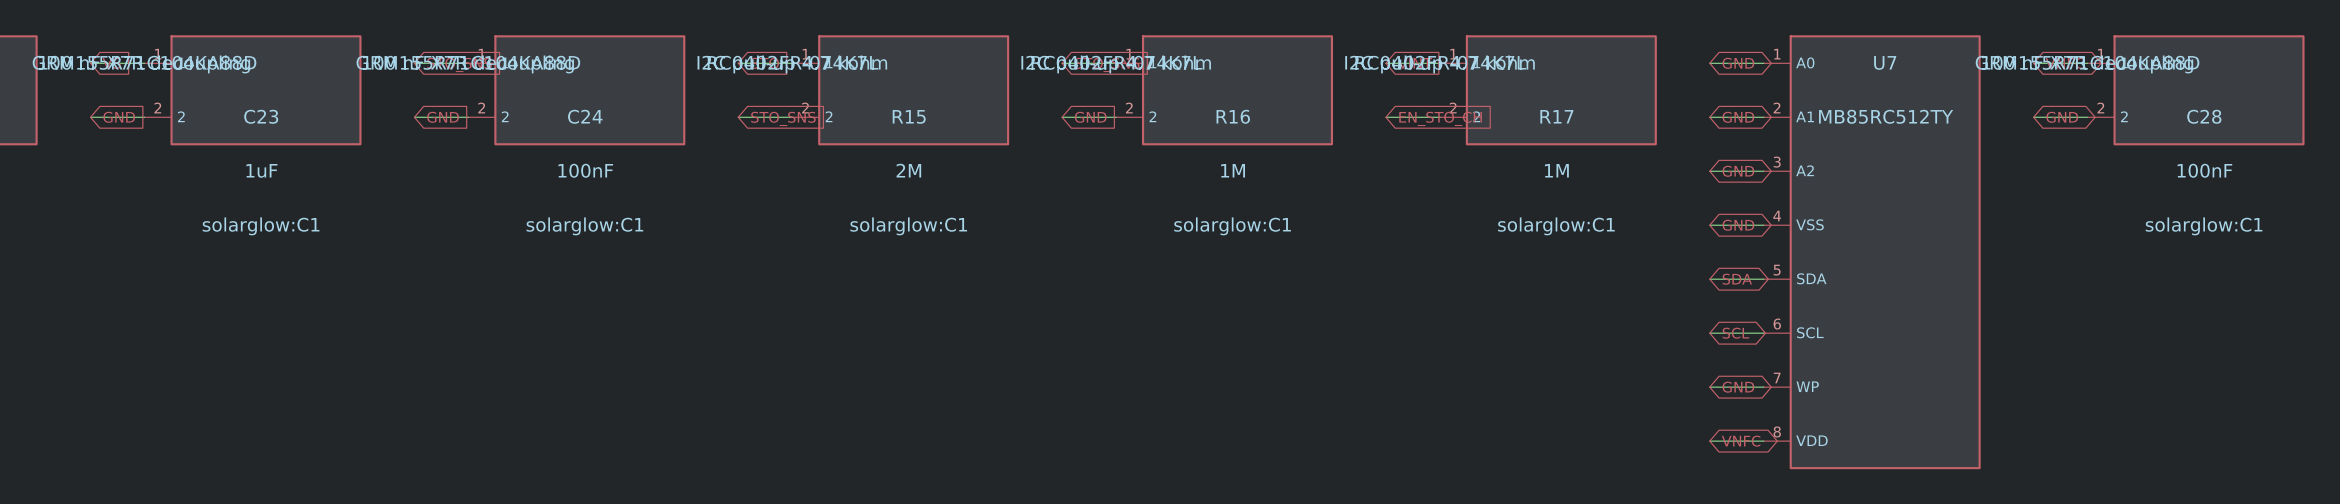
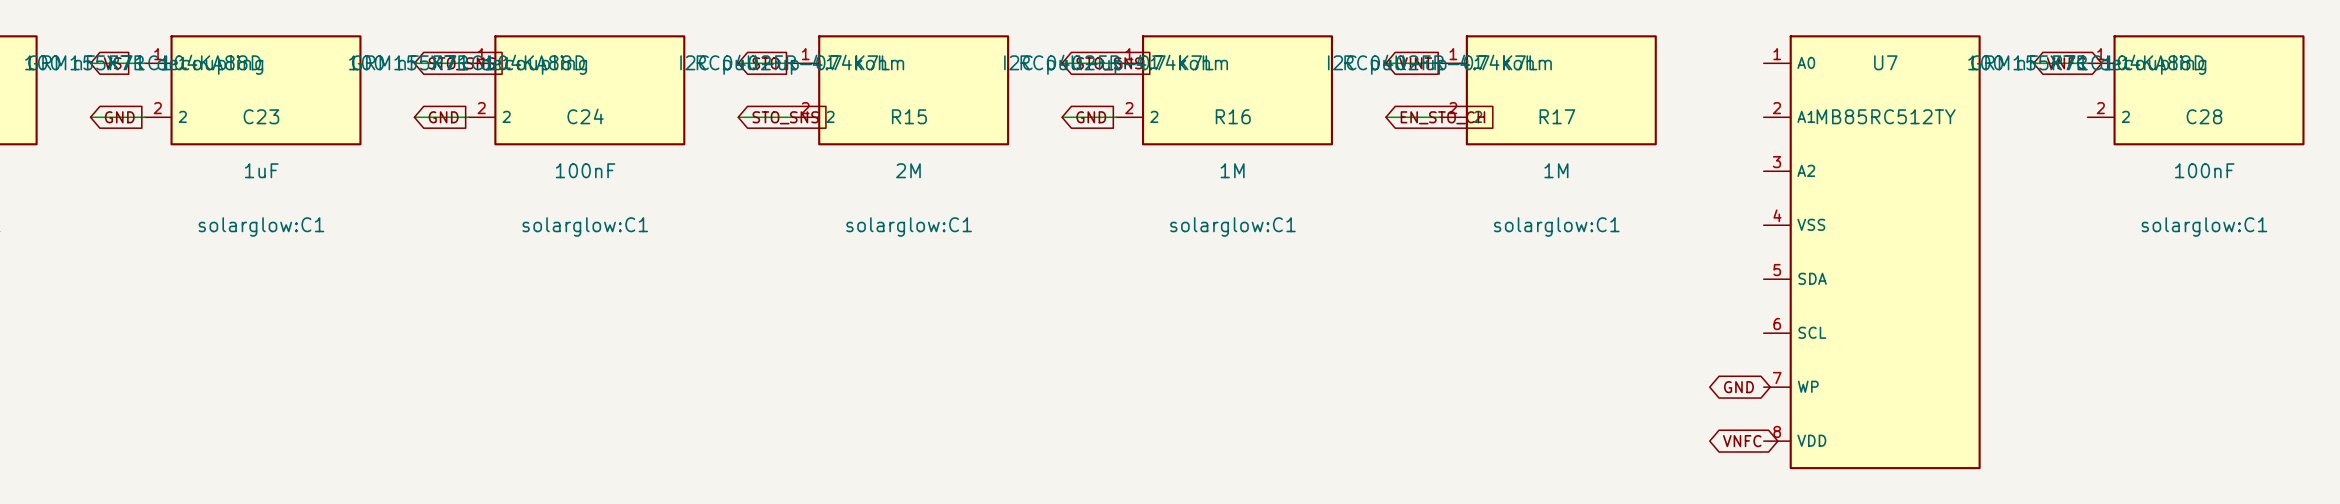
wire: (1709, 63) (1763, 63) -> none
global label: GND (1738, 63) -> none
wire: (1709, 117) (1763, 117) -> none
global label: GND (1738, 117) -> none
wire: (2033, 117) (2087, 117) -> none
global label: GND (2062, 117) -> none
wire: (1709, 171) (1763, 171) -> none
global label: GND (1738, 171) -> none
wire: (1709, 225) (1763, 225) -> none
global label: GND (1738, 225) -> none
wire: (1709, 279) (1763, 279) -> none
global label: SDA (1737, 279) -> none
wire: (1709, 333) (1763, 333) -> none
global label: SCL (1735, 333) -> none
wire: (1709, 387) (1763, 387) -> none
wire: (1709, 441) (1763, 441) -> none

